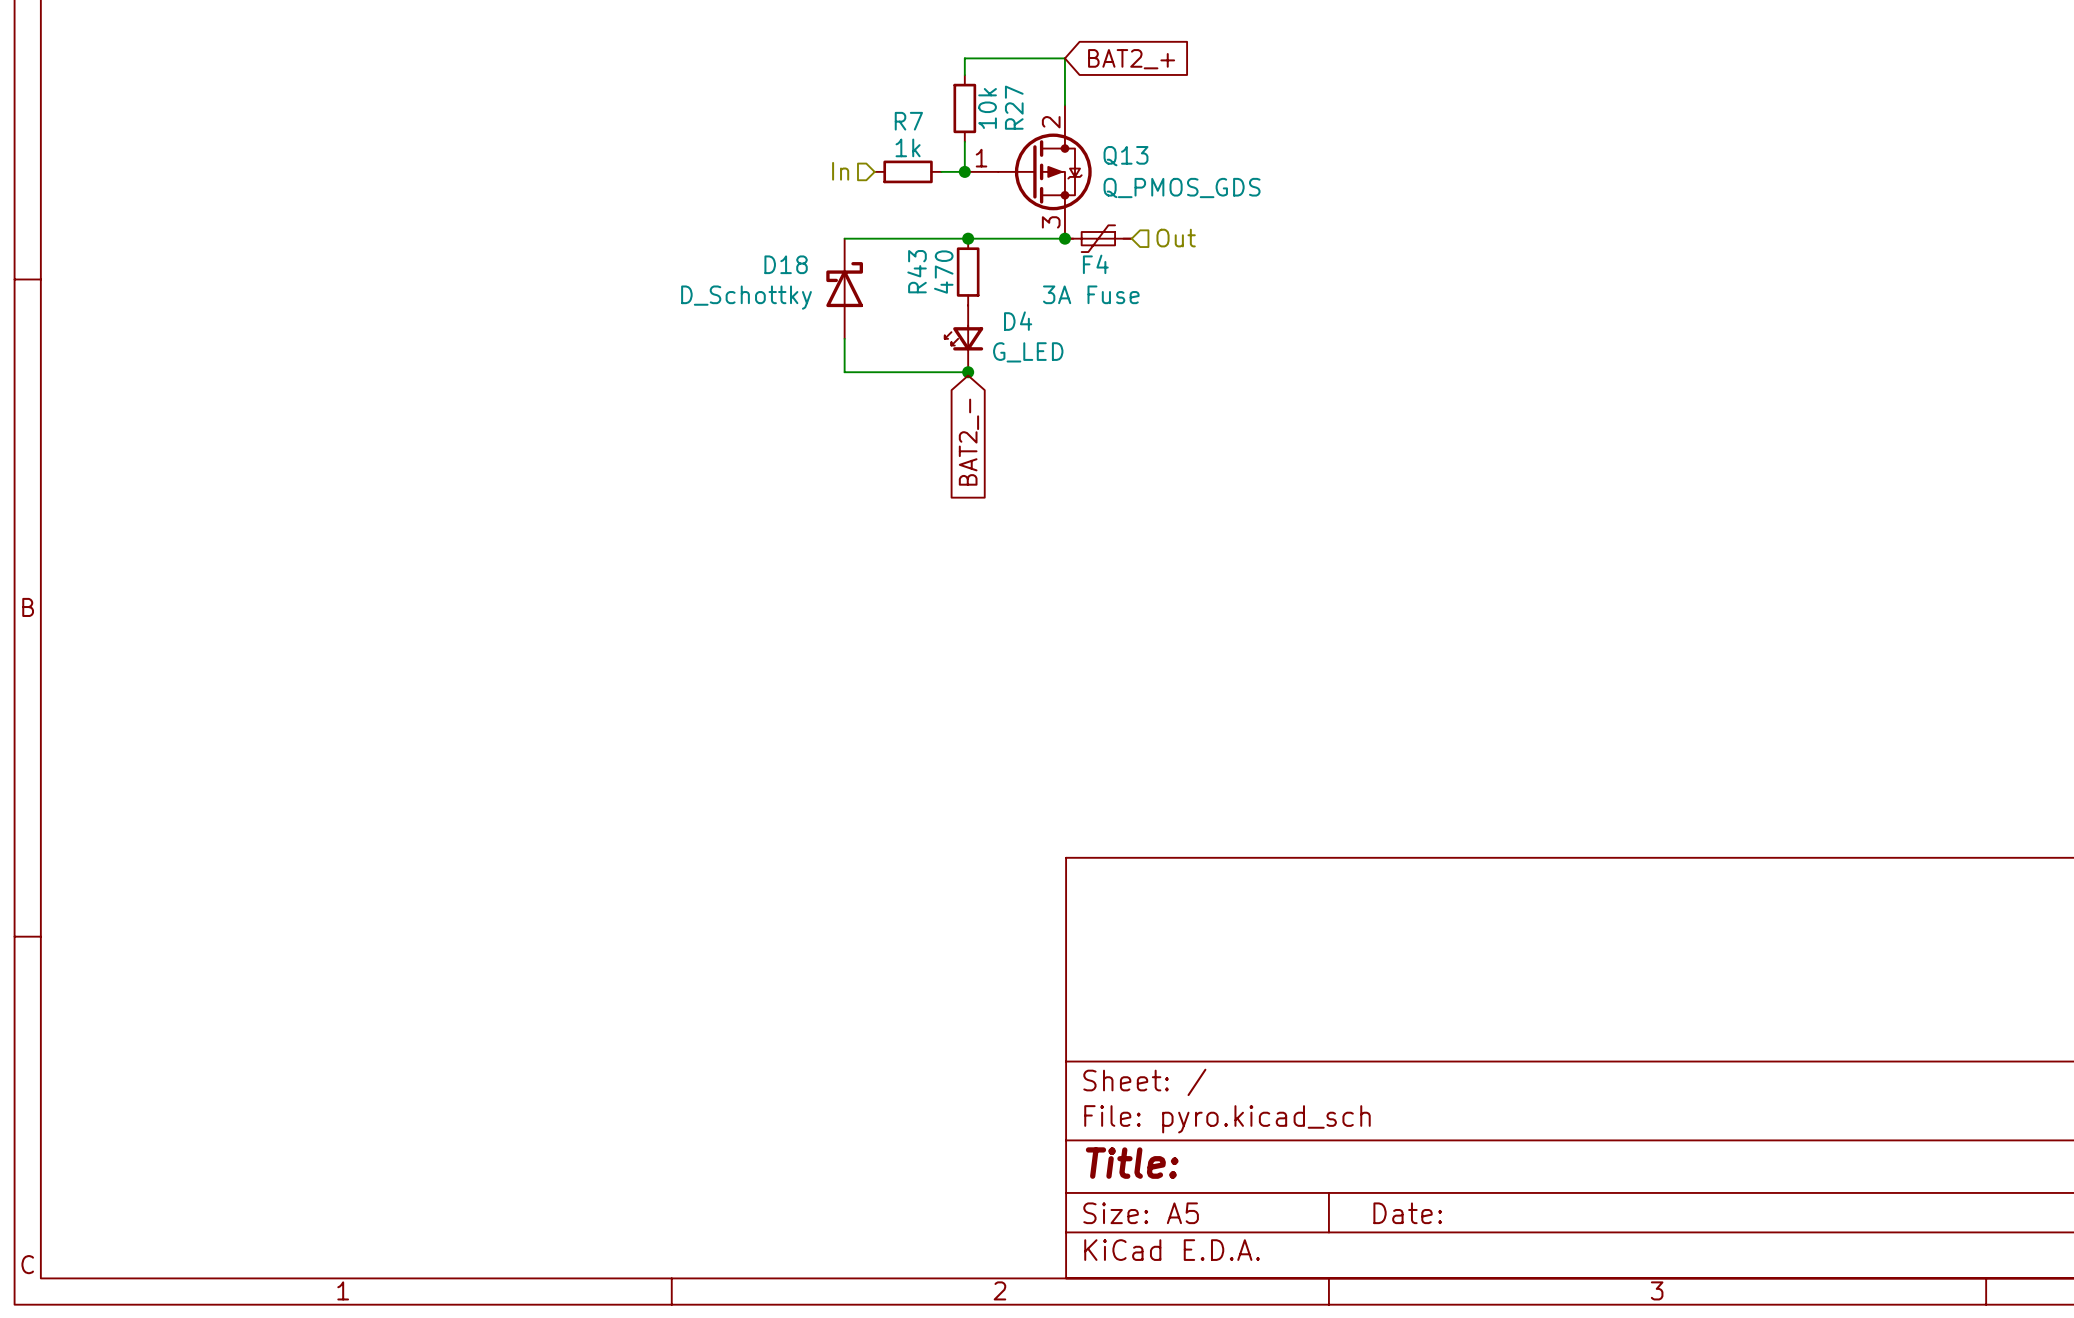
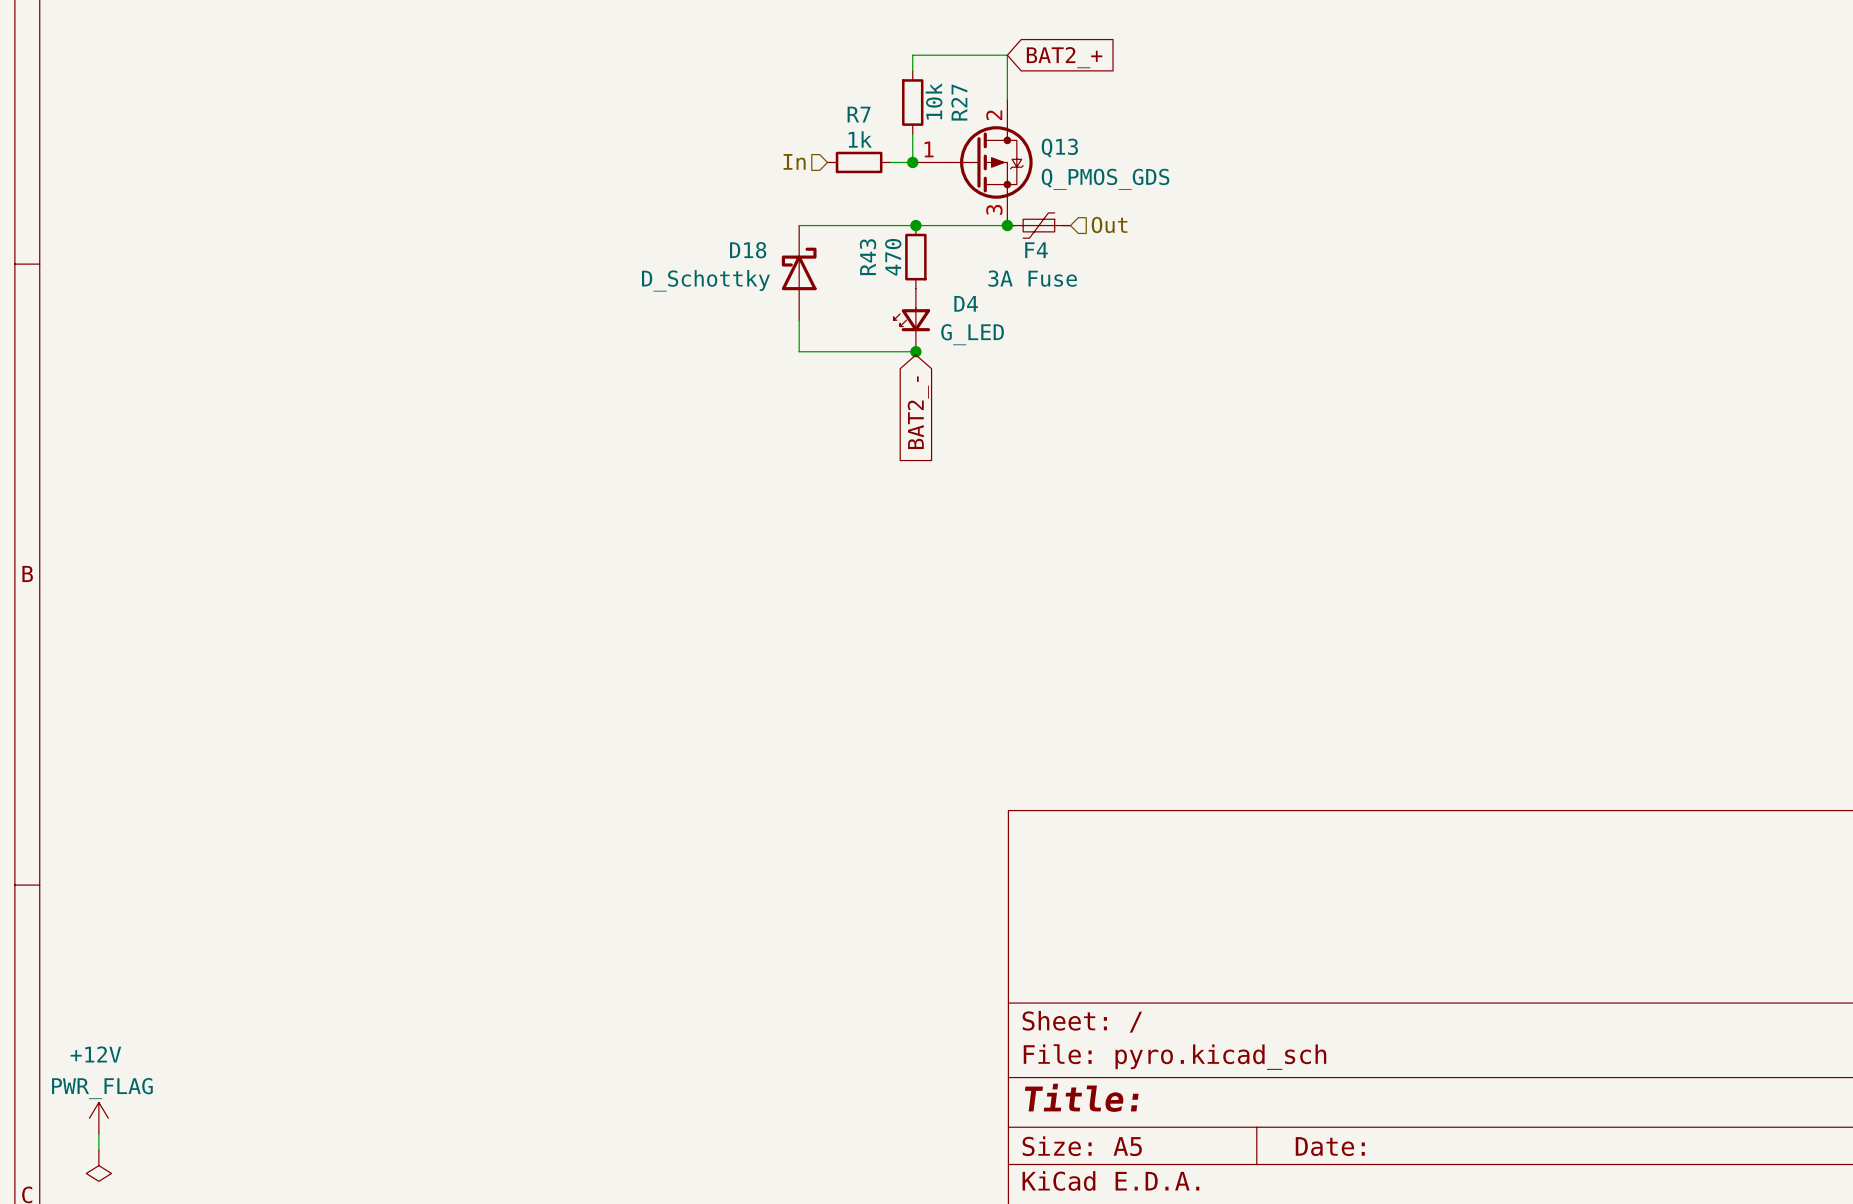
power symbol: none -> +12V (98, 1118)
wire: none -> (98, 1134) (98, 1149)
power symbol: none -> PWR_FLAG (98, 1165)

